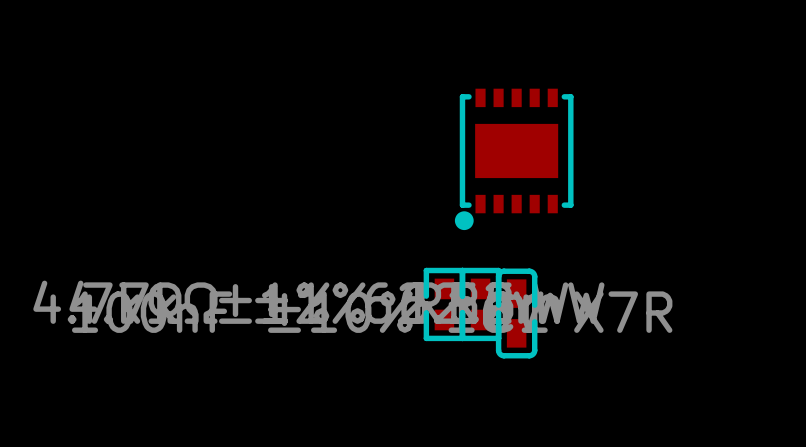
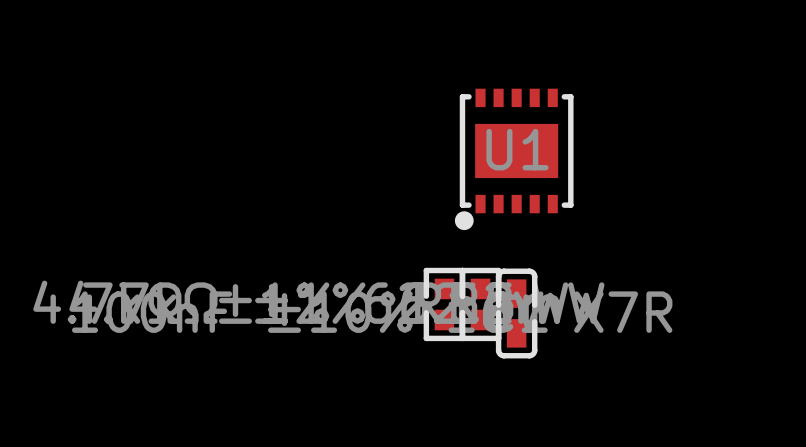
U1 name: none -> U1 (517, 149)

